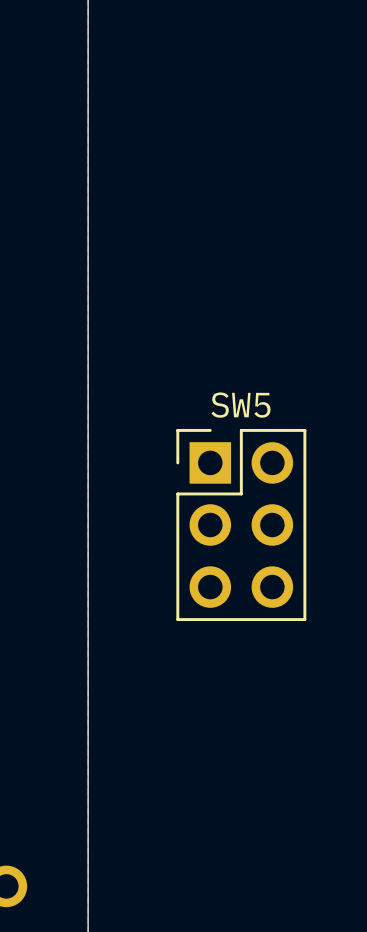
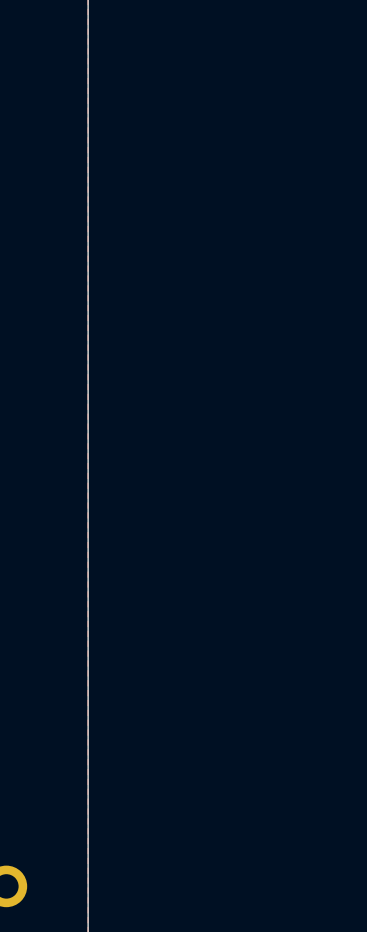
SW5: (241, 524) -> none

